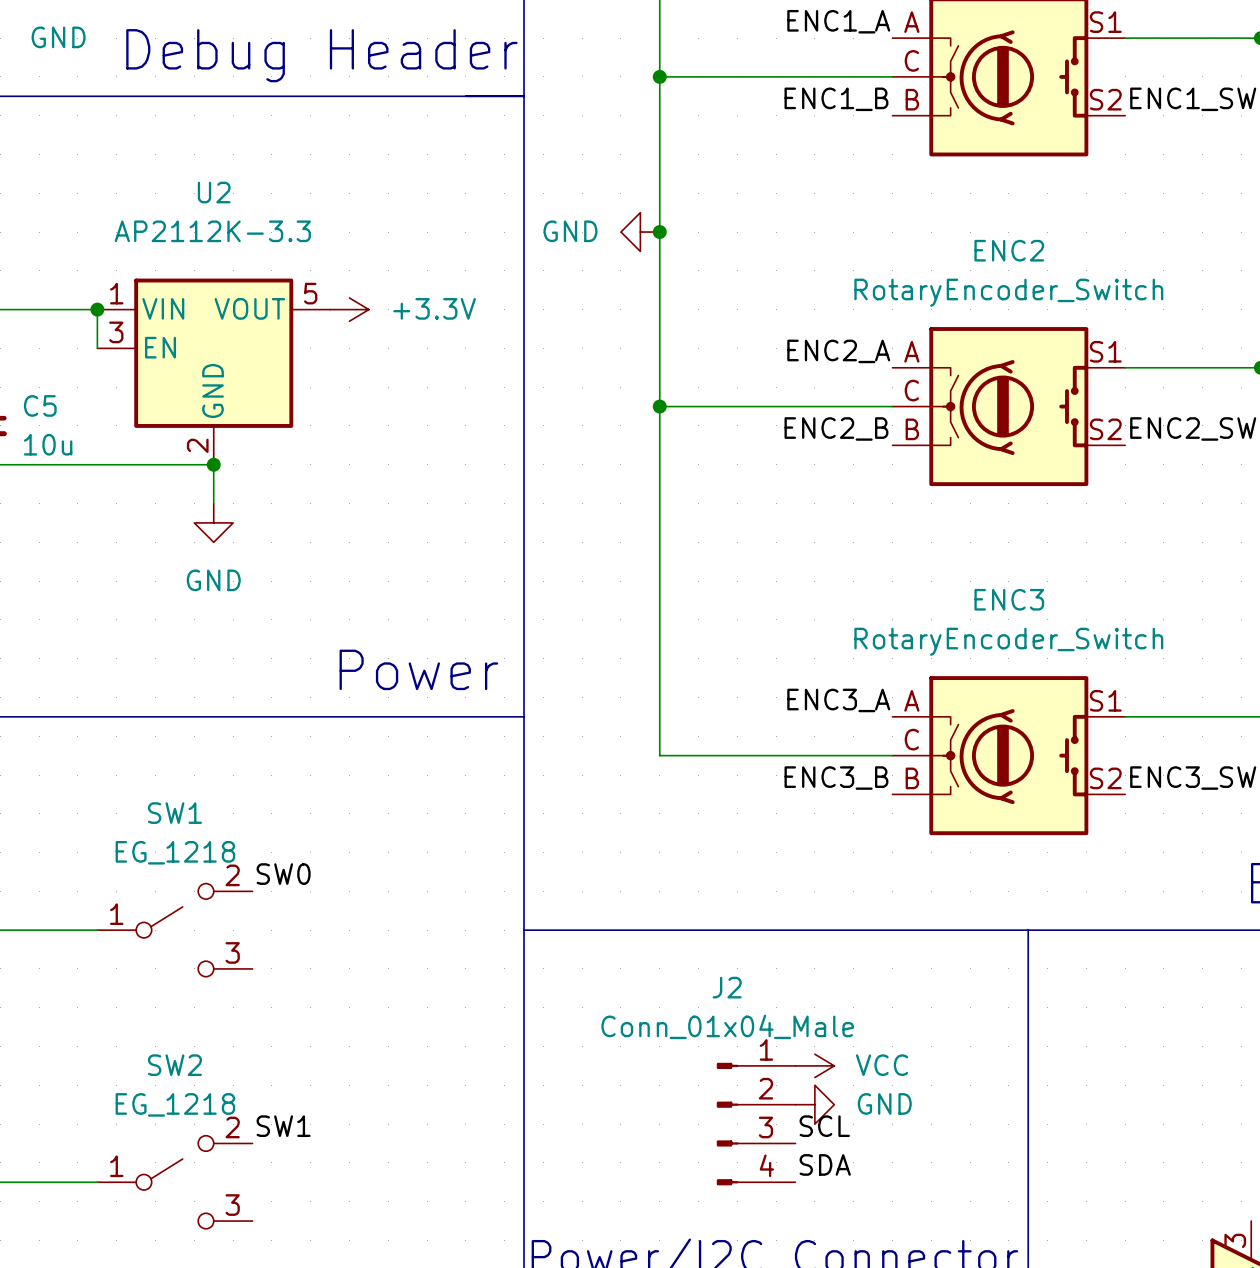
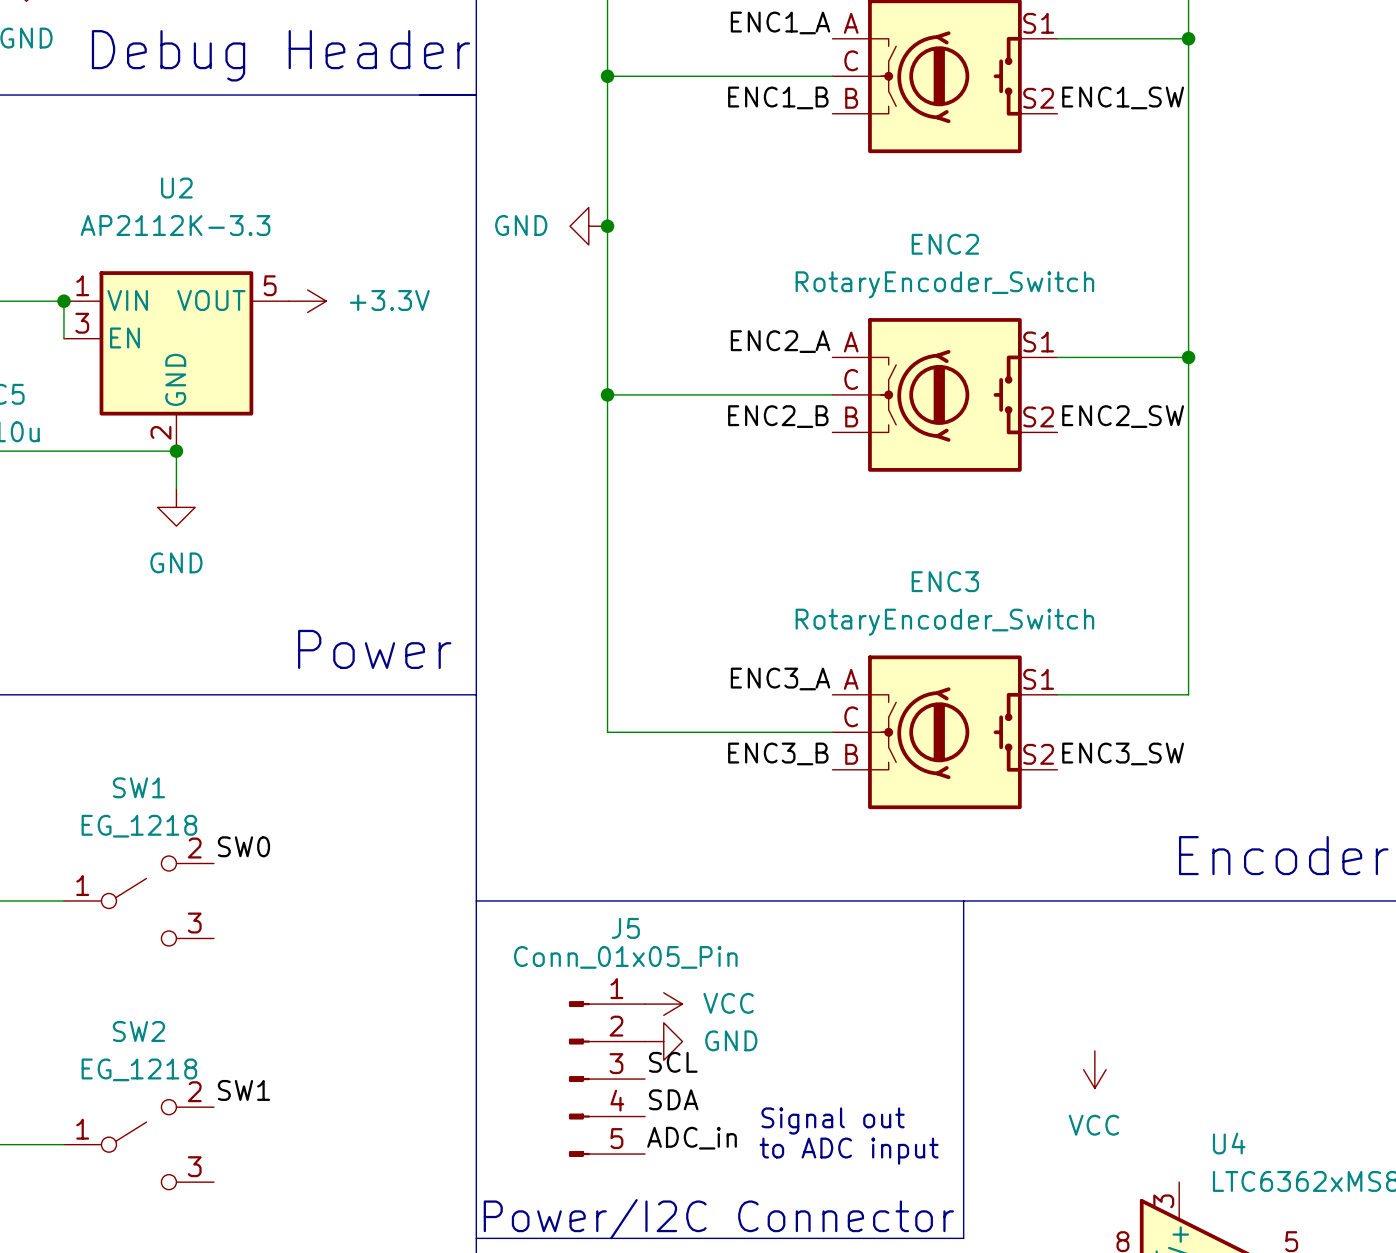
power symbol position: VCC (814, 1065) -> VCC (663, 1004)
power symbol position: GND (814, 1104) -> GND (663, 1041)
power symbol: none -> VCC (1094, 1069)
J5: none -> Conn_01x05_Pin (606, 1079)
J2: Conn_01x04_Male (756, 1124) -> none
label position: SCL (824, 1126) -> SCL (673, 1062)
text: none -> Signal out (833, 1120)
label position: SDA (825, 1164) -> SDA (673, 1099)
label: none -> ADC_in (692, 1138)
text: none -> to ADC input (849, 1151)

